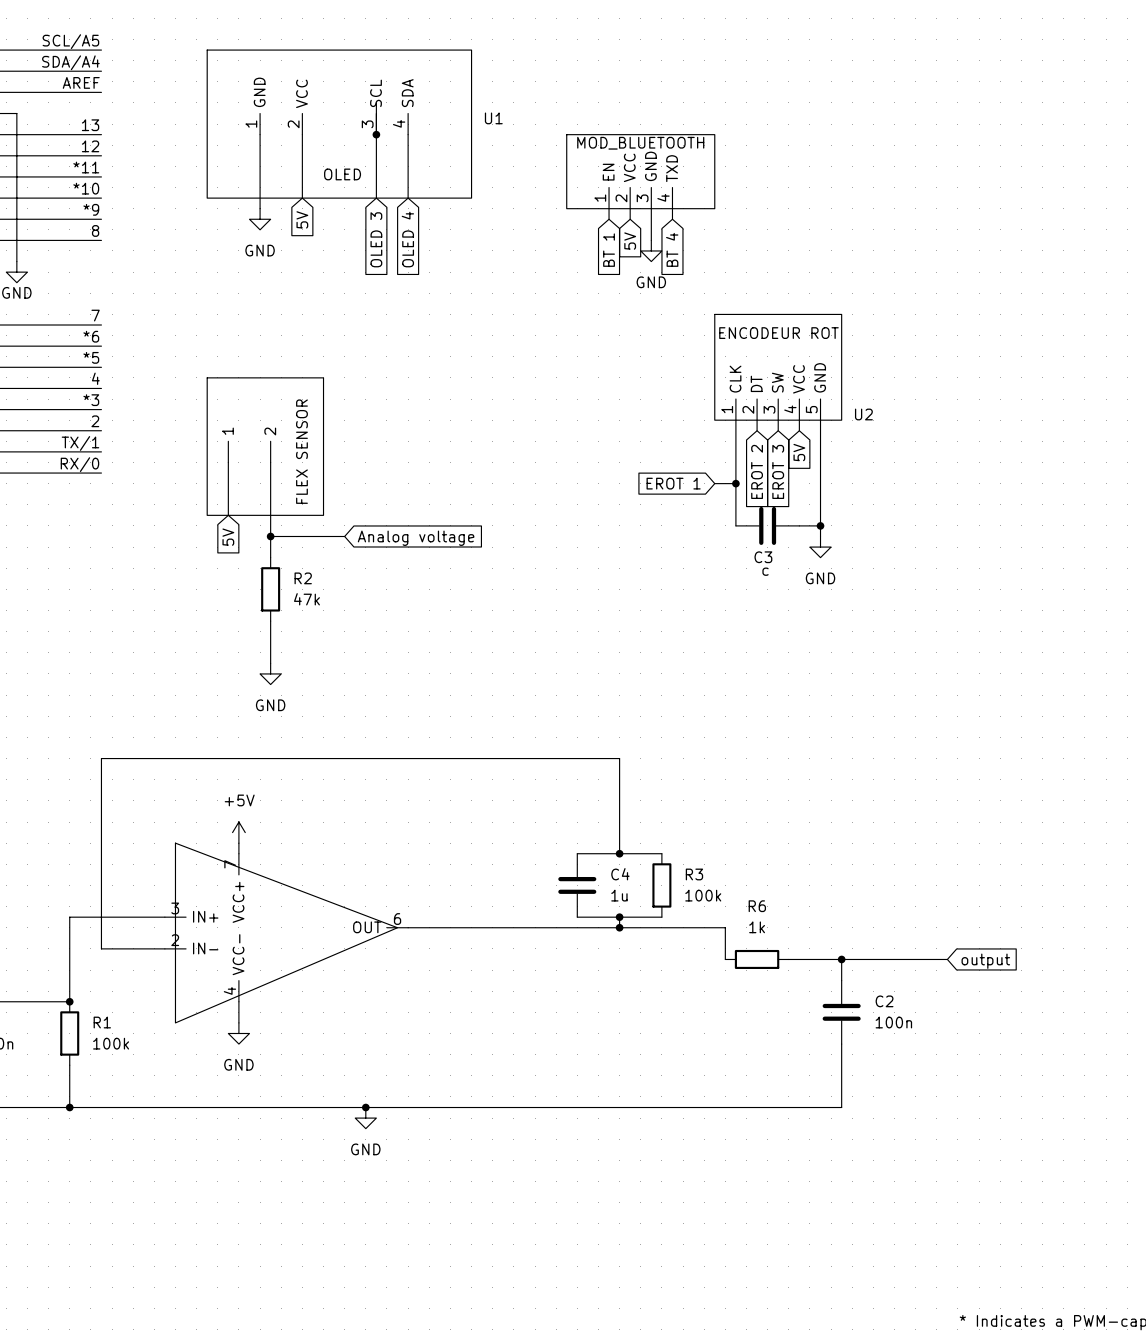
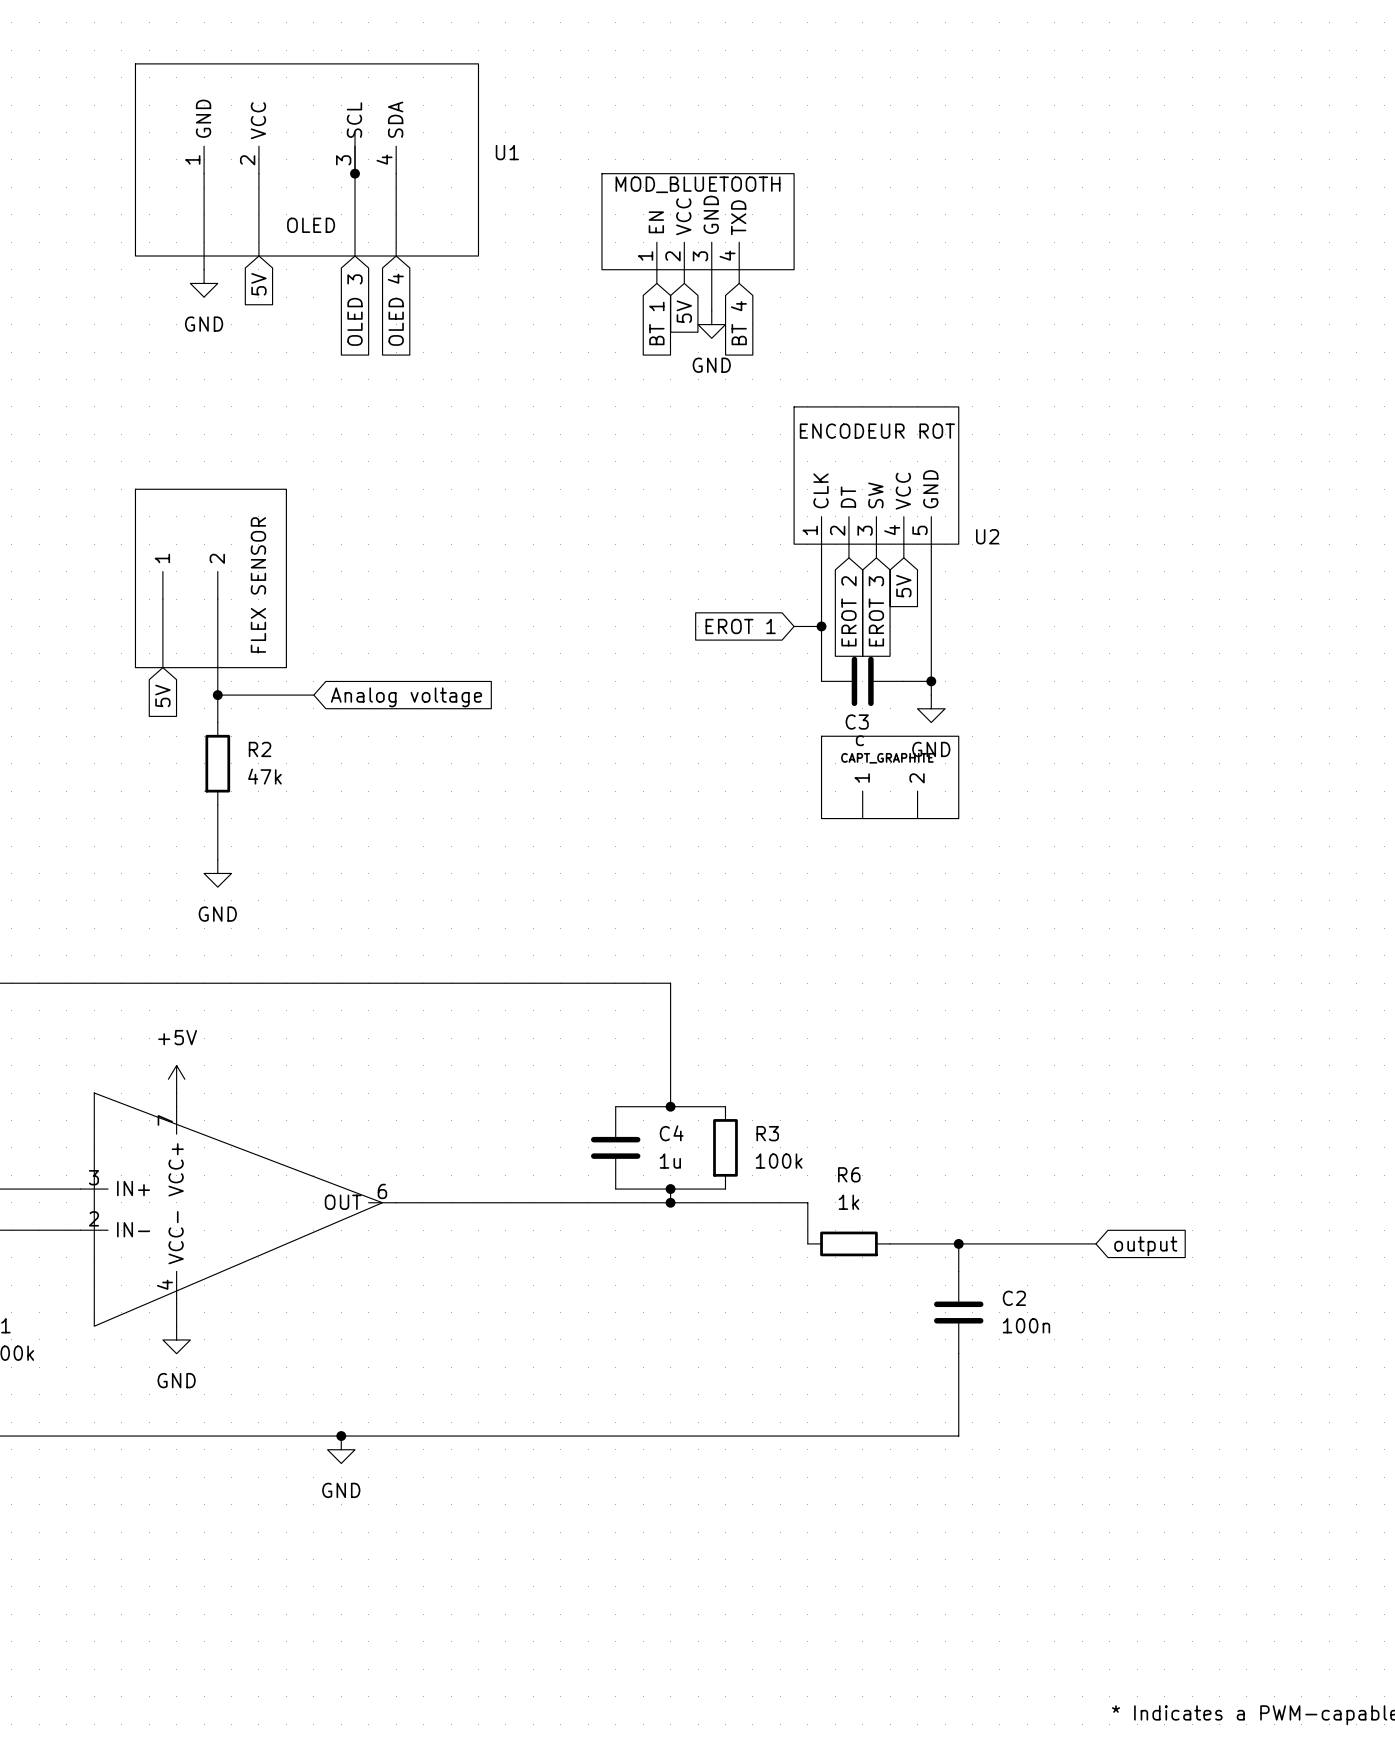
part: none -> (890, 777)

